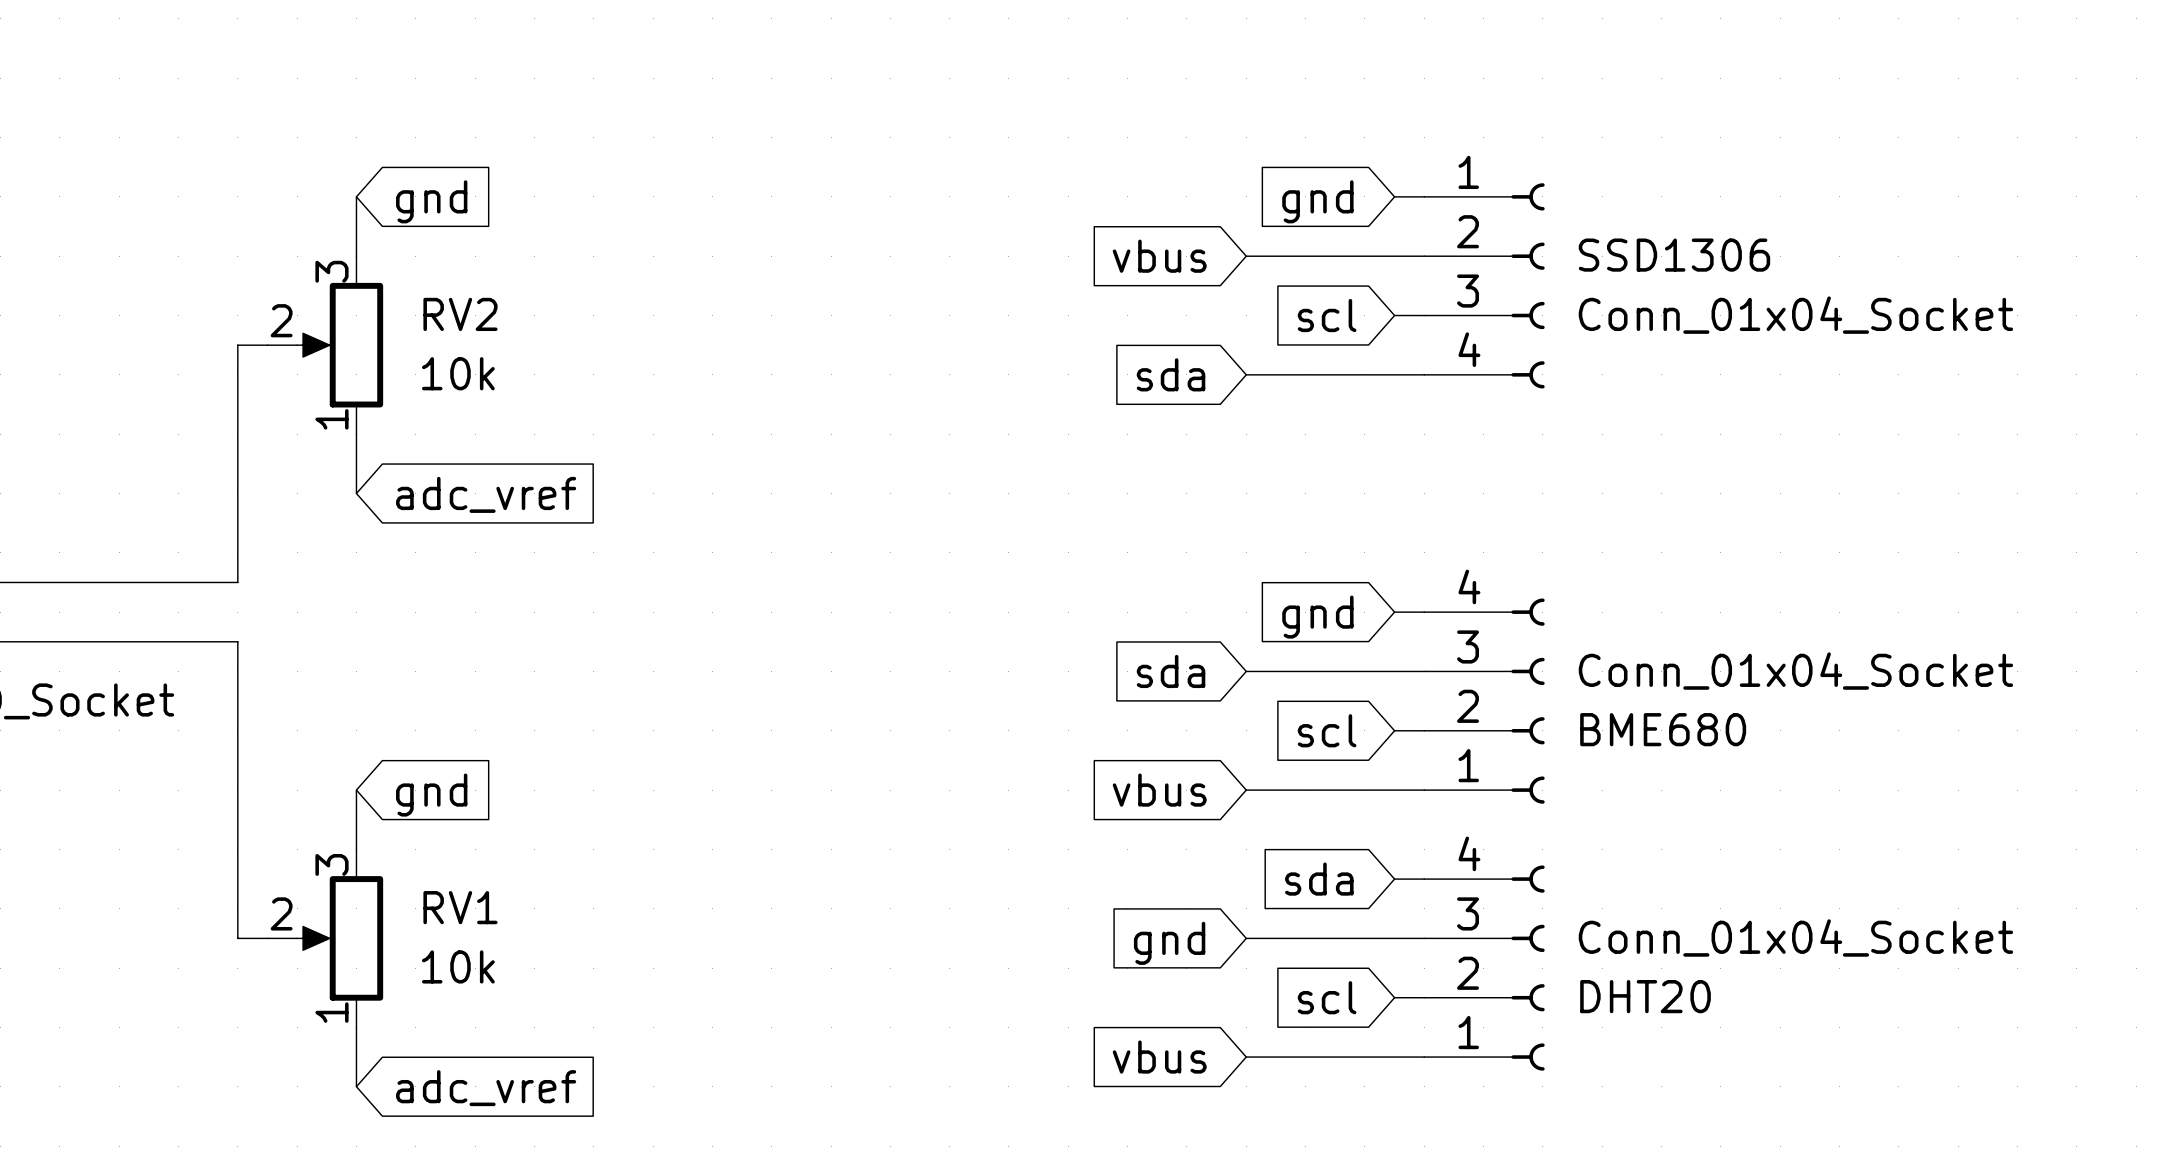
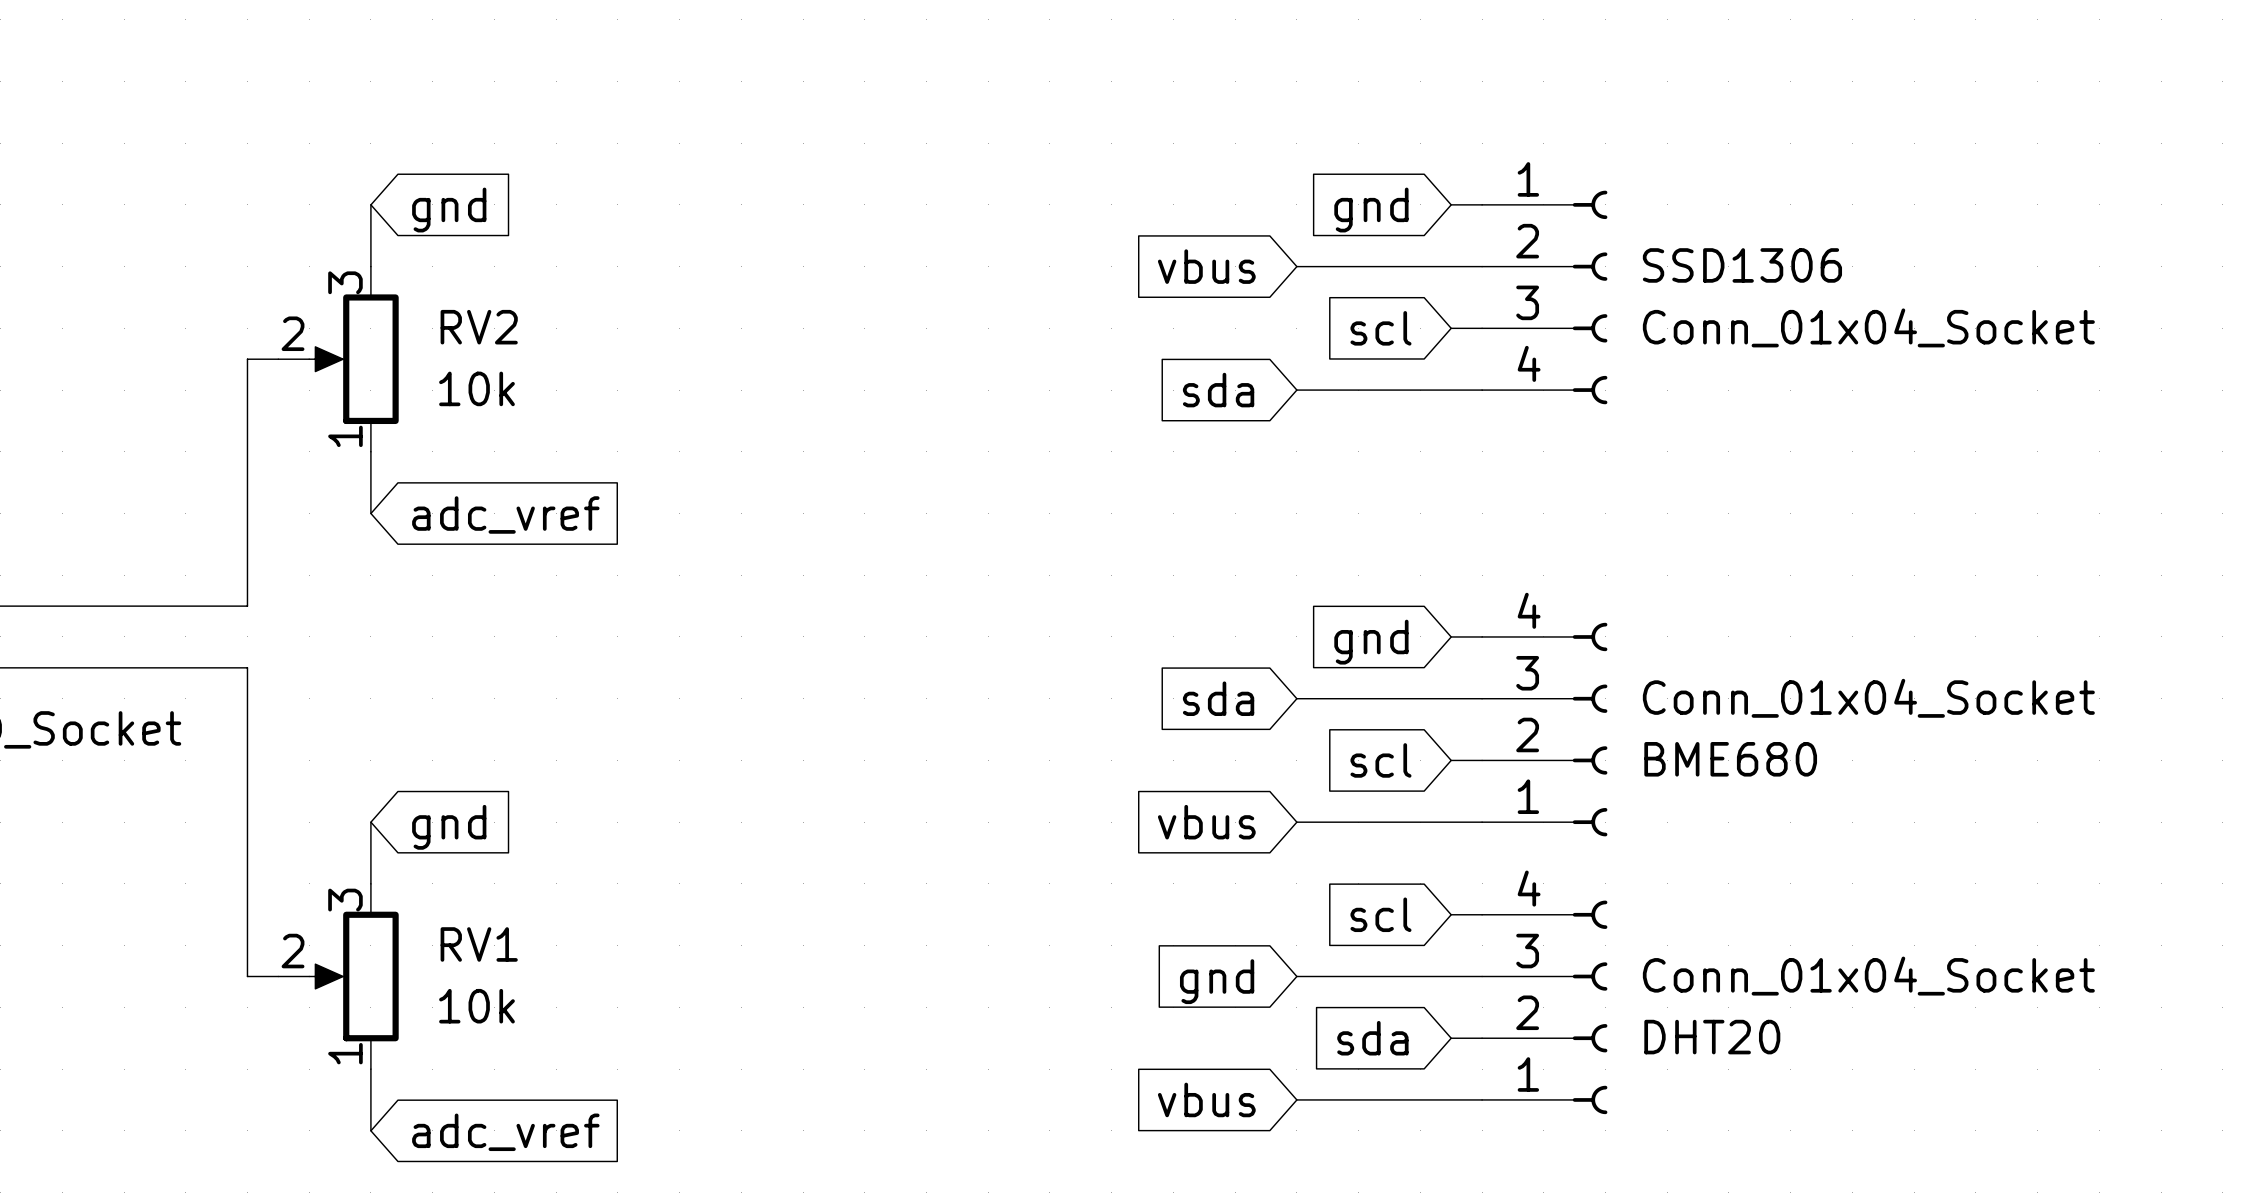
global label: sda (1319, 879) -> scl (1380, 914)
global label: scl (1327, 997) -> sda (1372, 1038)

